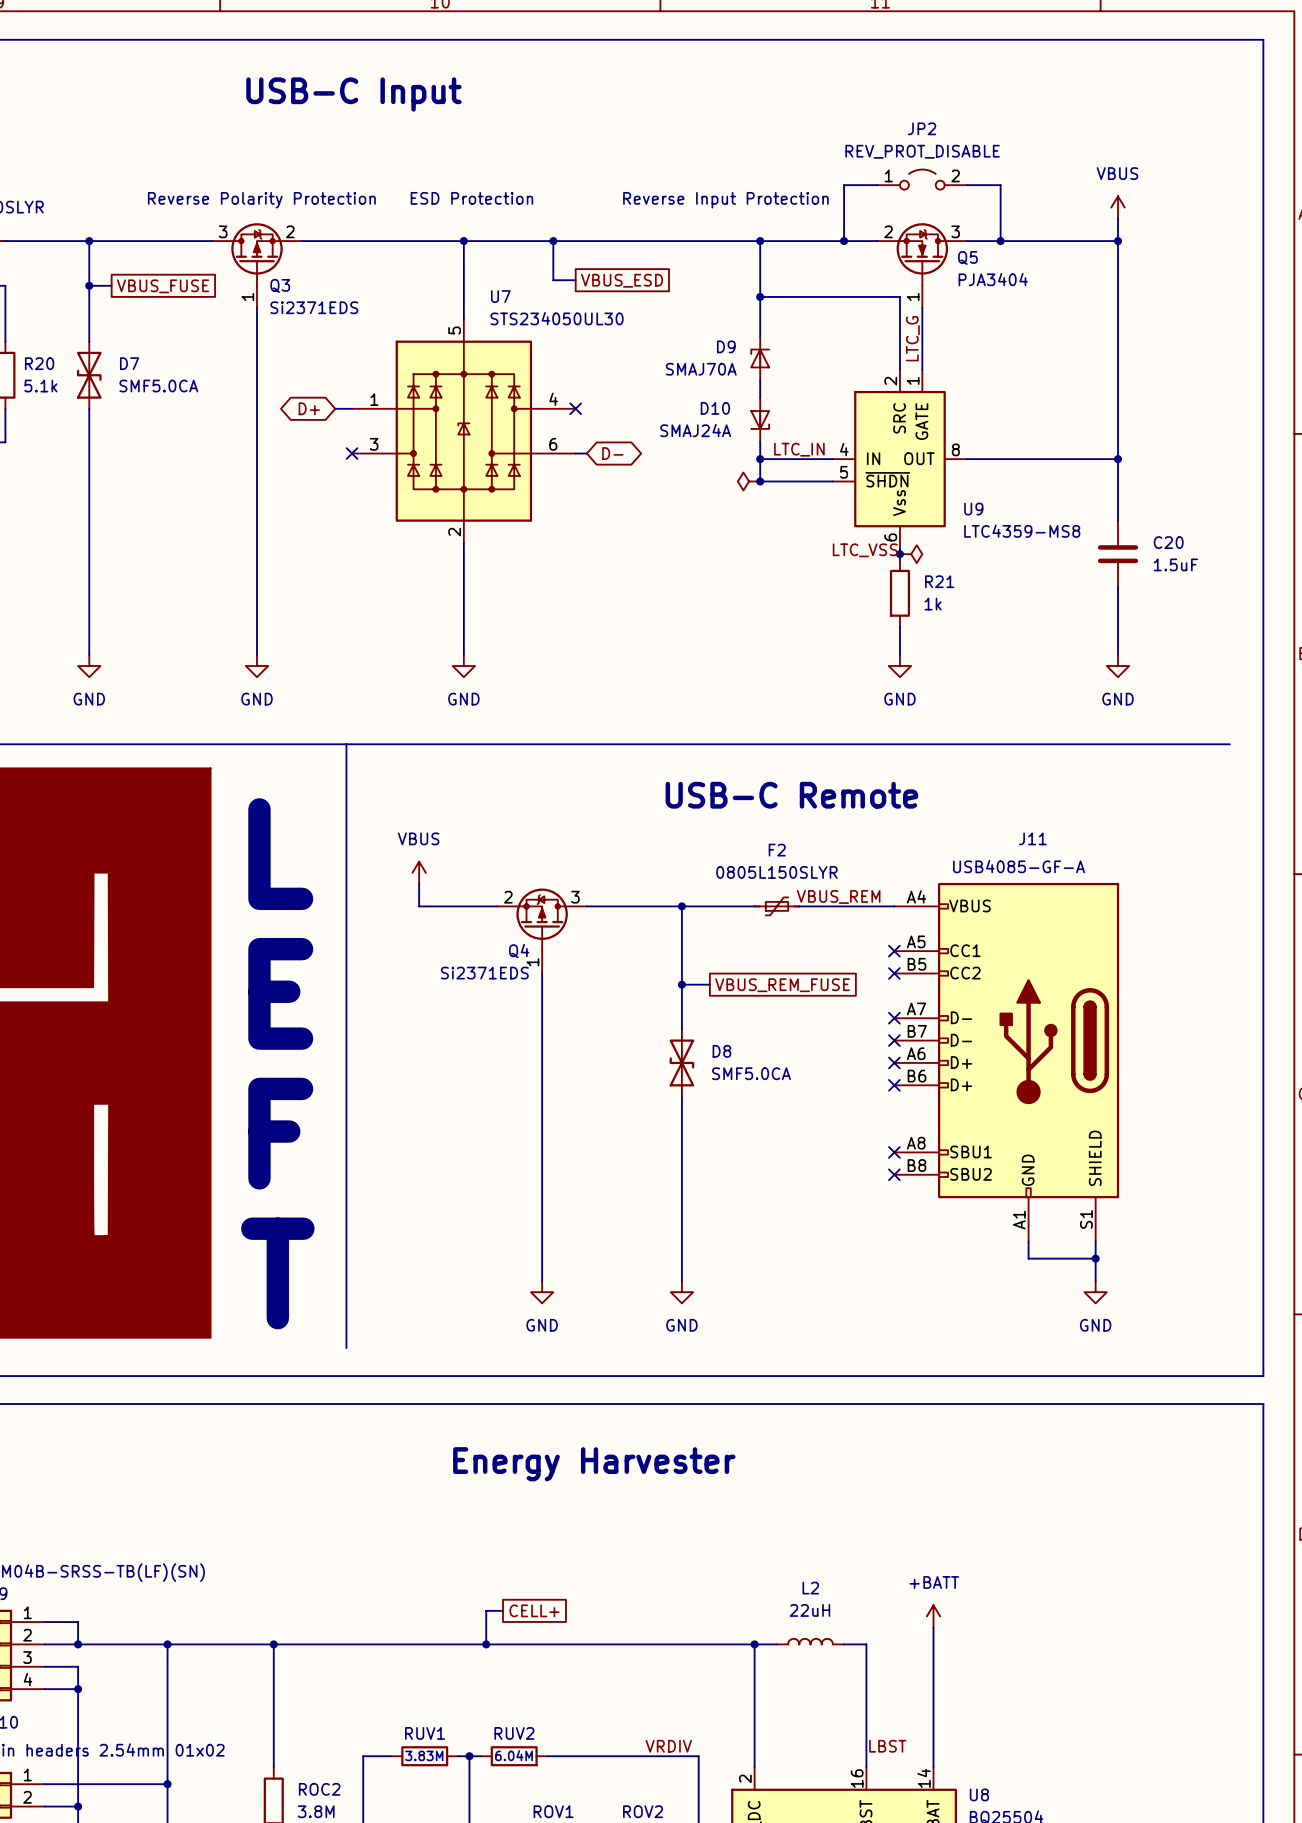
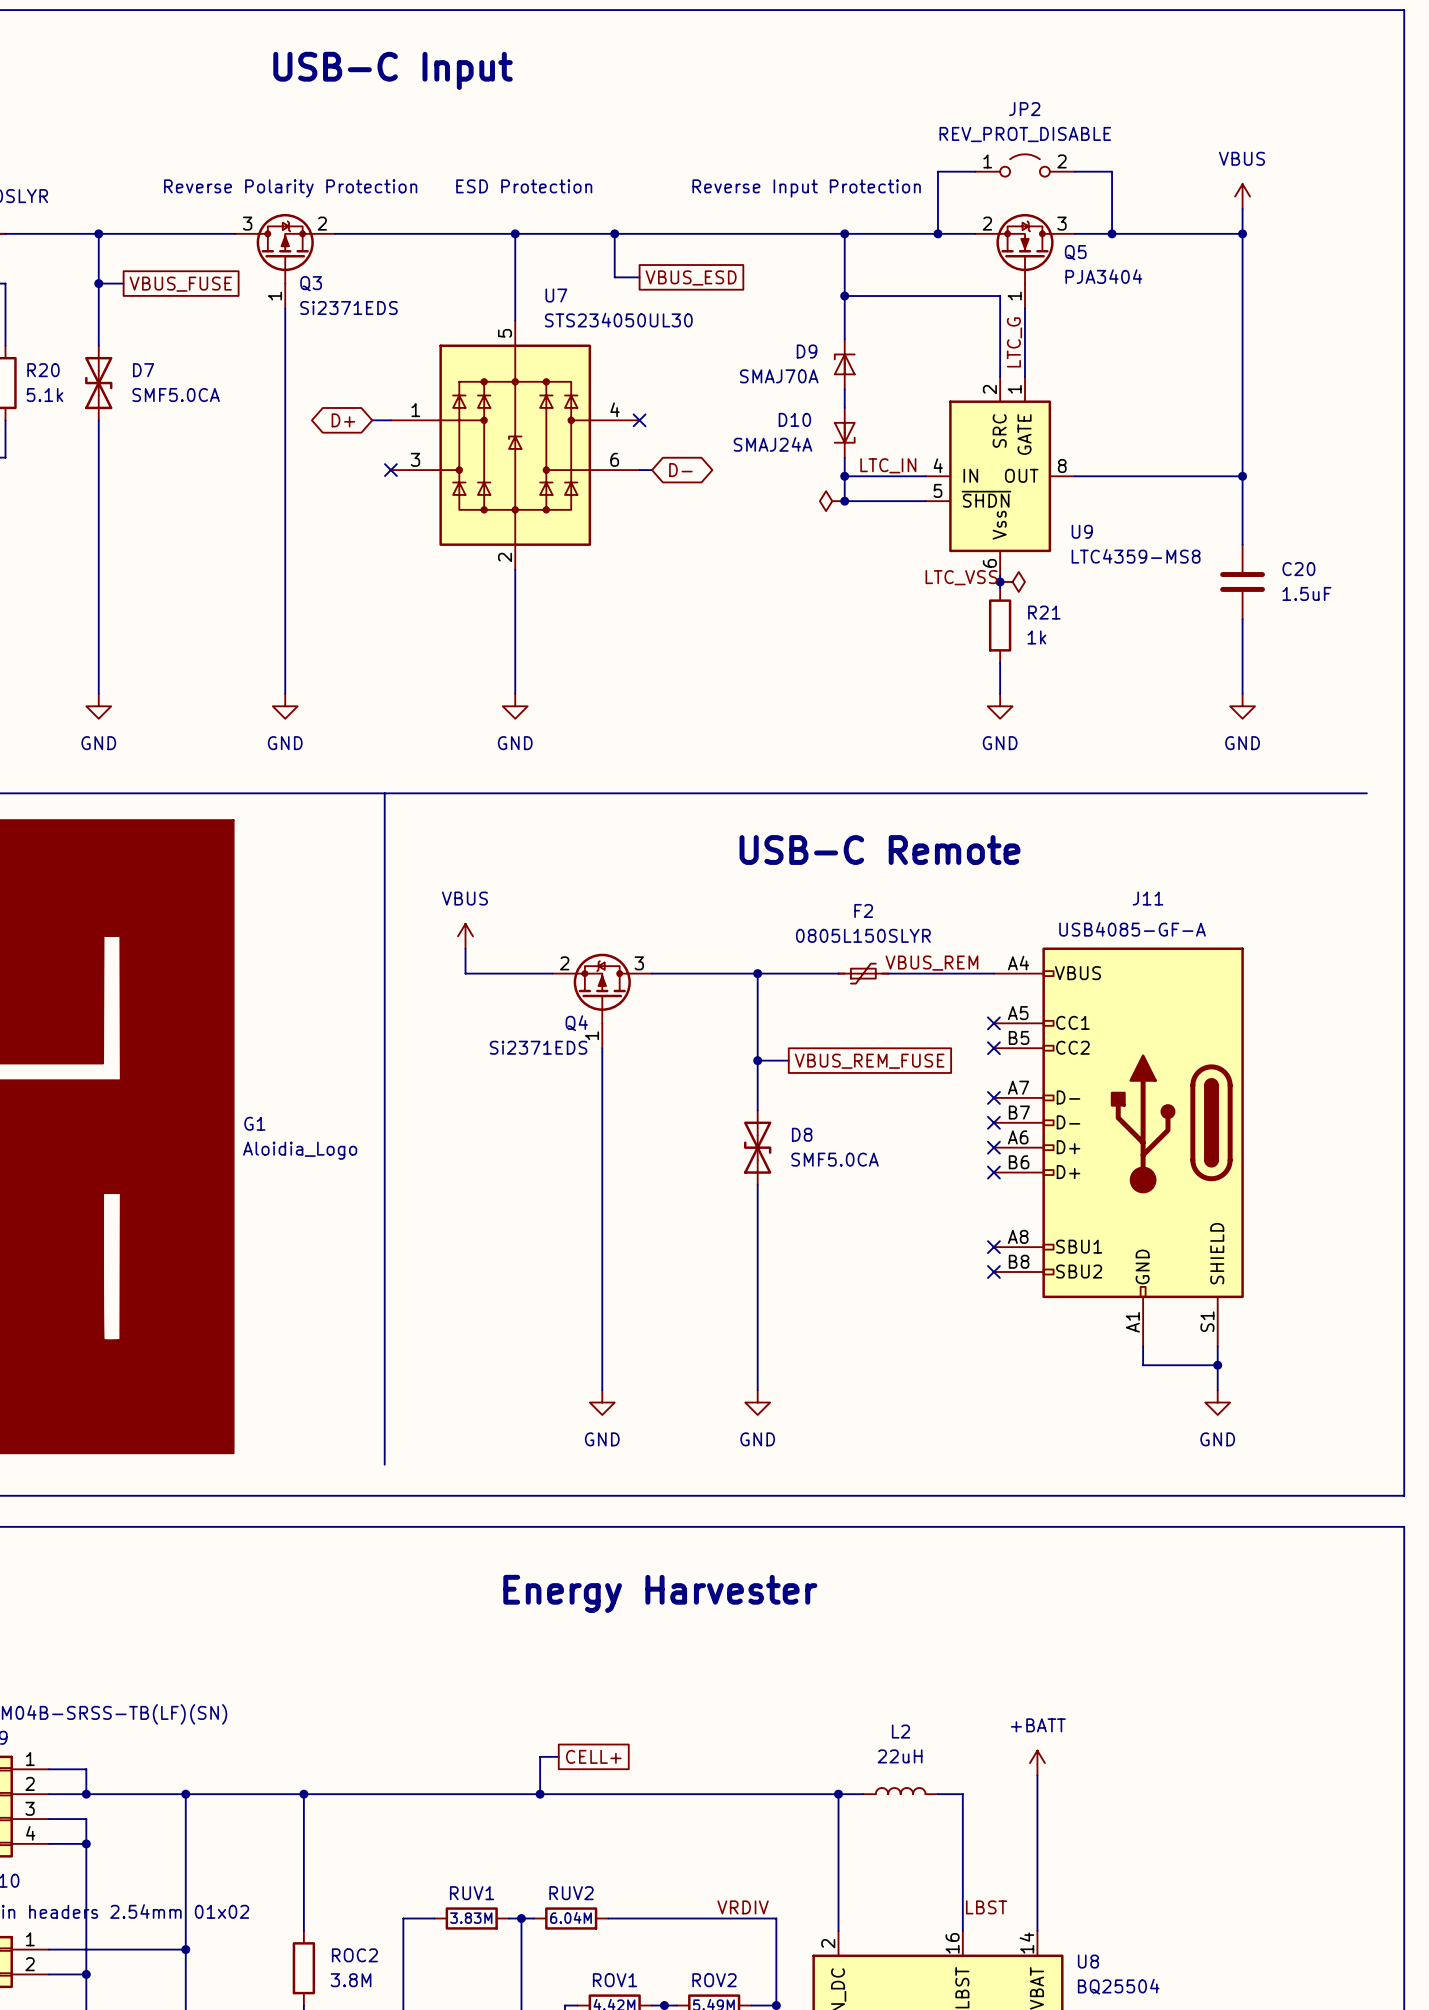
text: L (280, 854) -> none
text: E (280, 993) -> none
G1 name: none -> G1 (254, 1123)
G1 value: none -> Aloidia_Logo (300, 1150)
text: F (280, 1133) -> none
text: T (277, 1273) -> none

